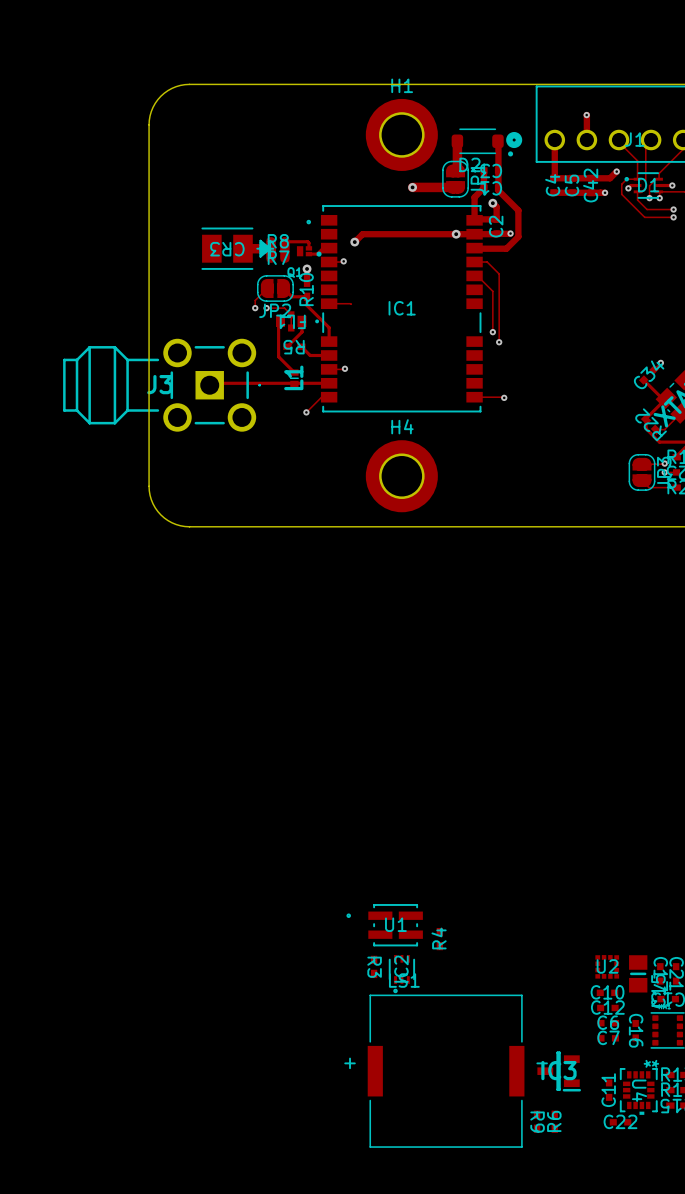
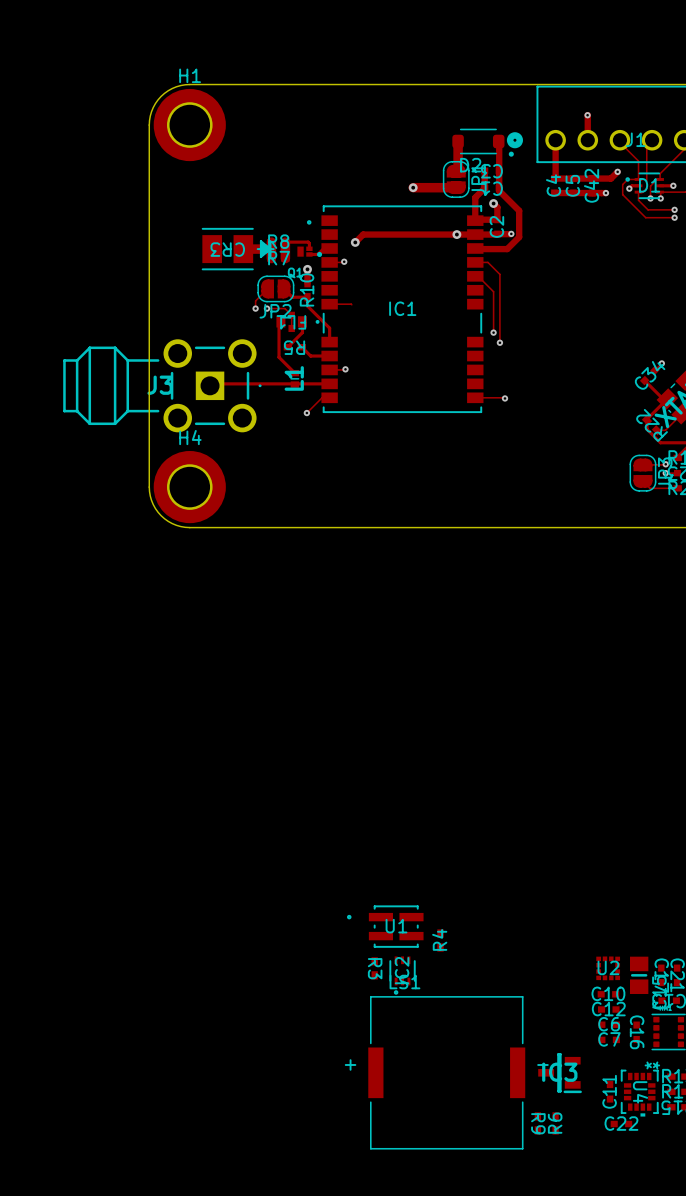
H1 position: (401, 134) -> (189, 125)
H4 position: (401, 476) -> (189, 487)

